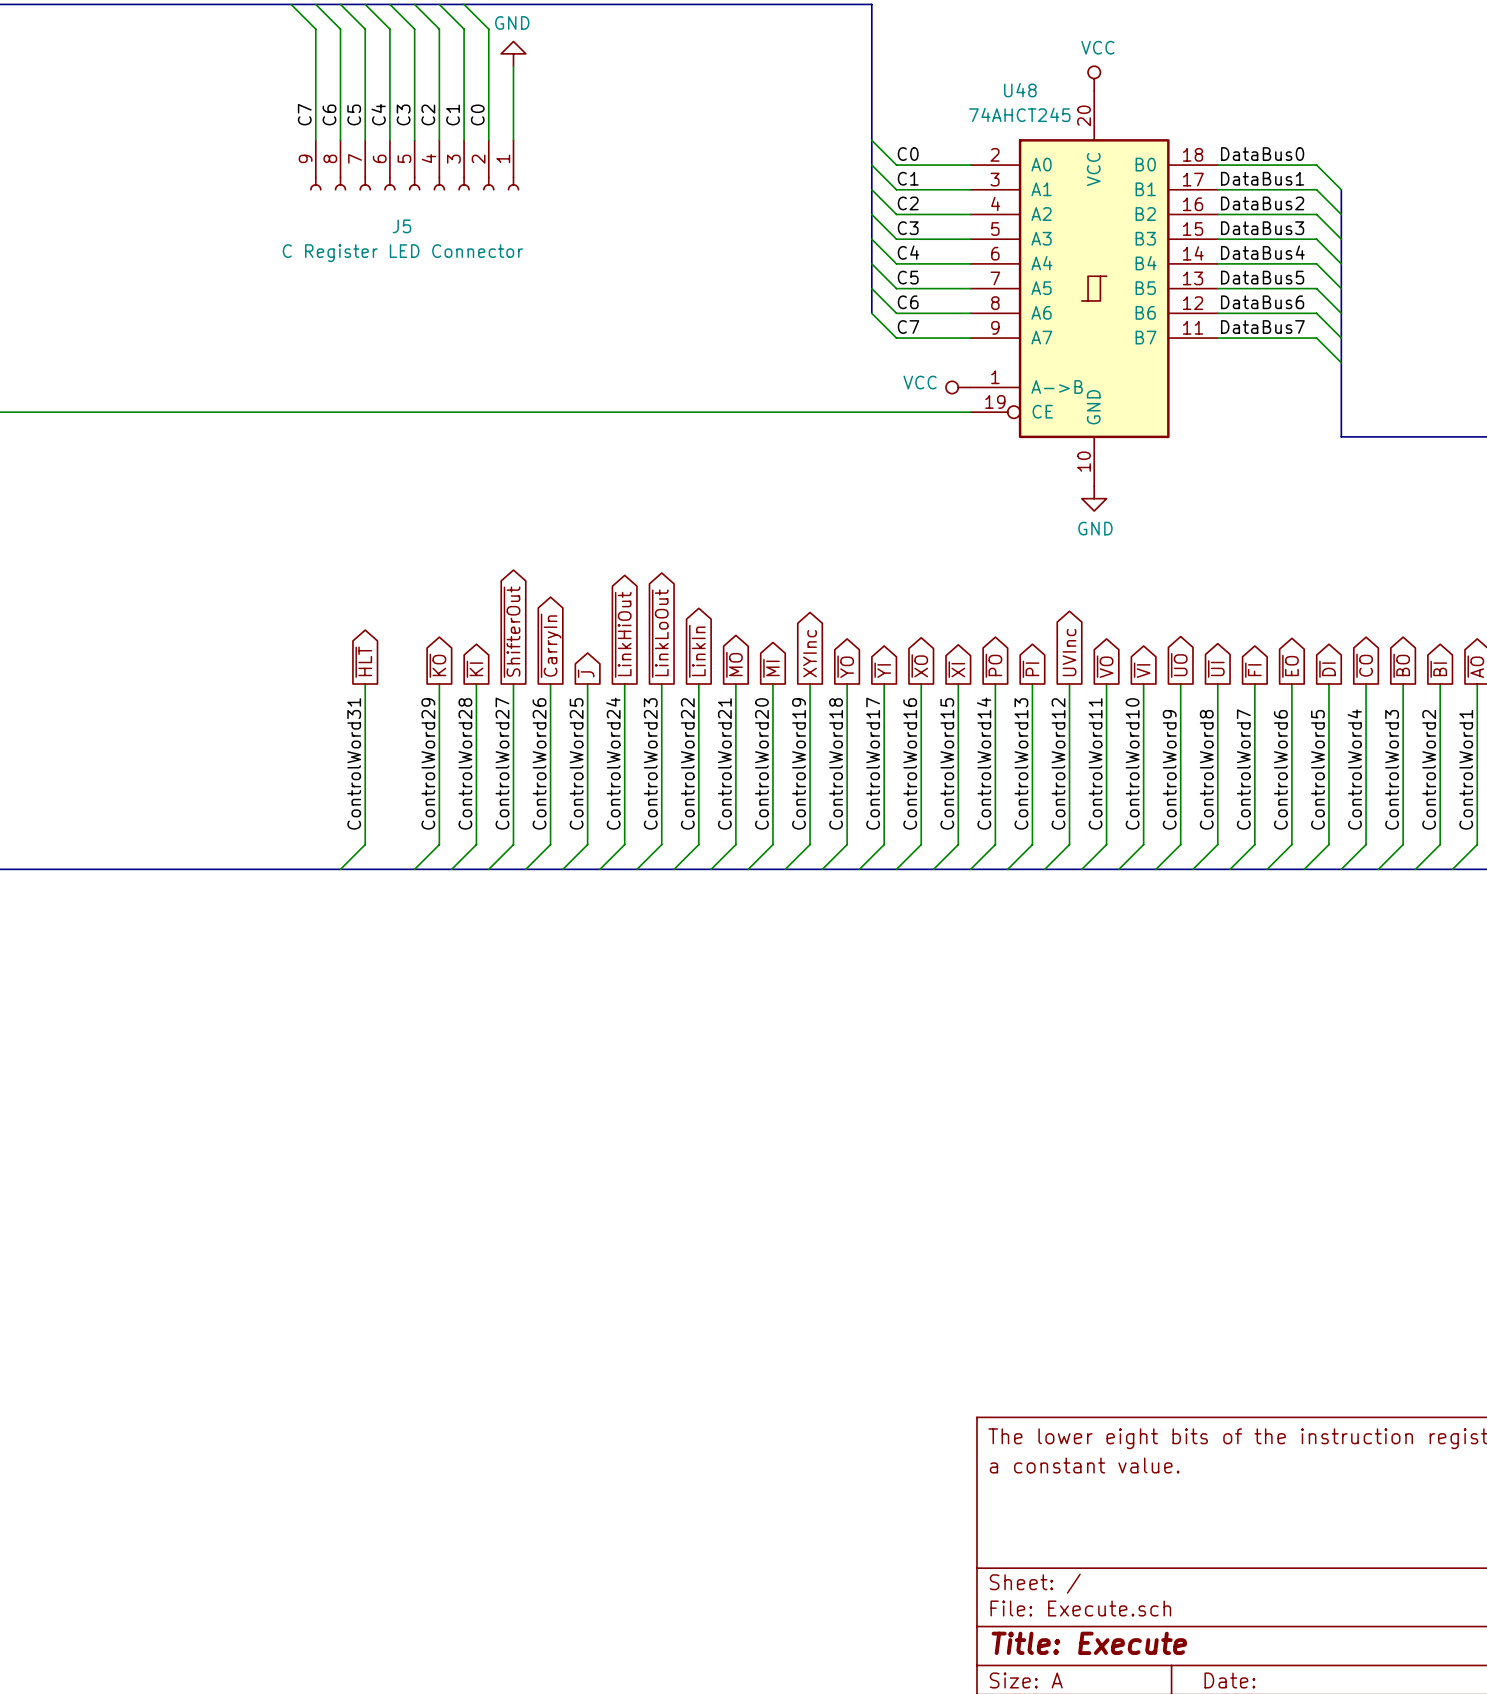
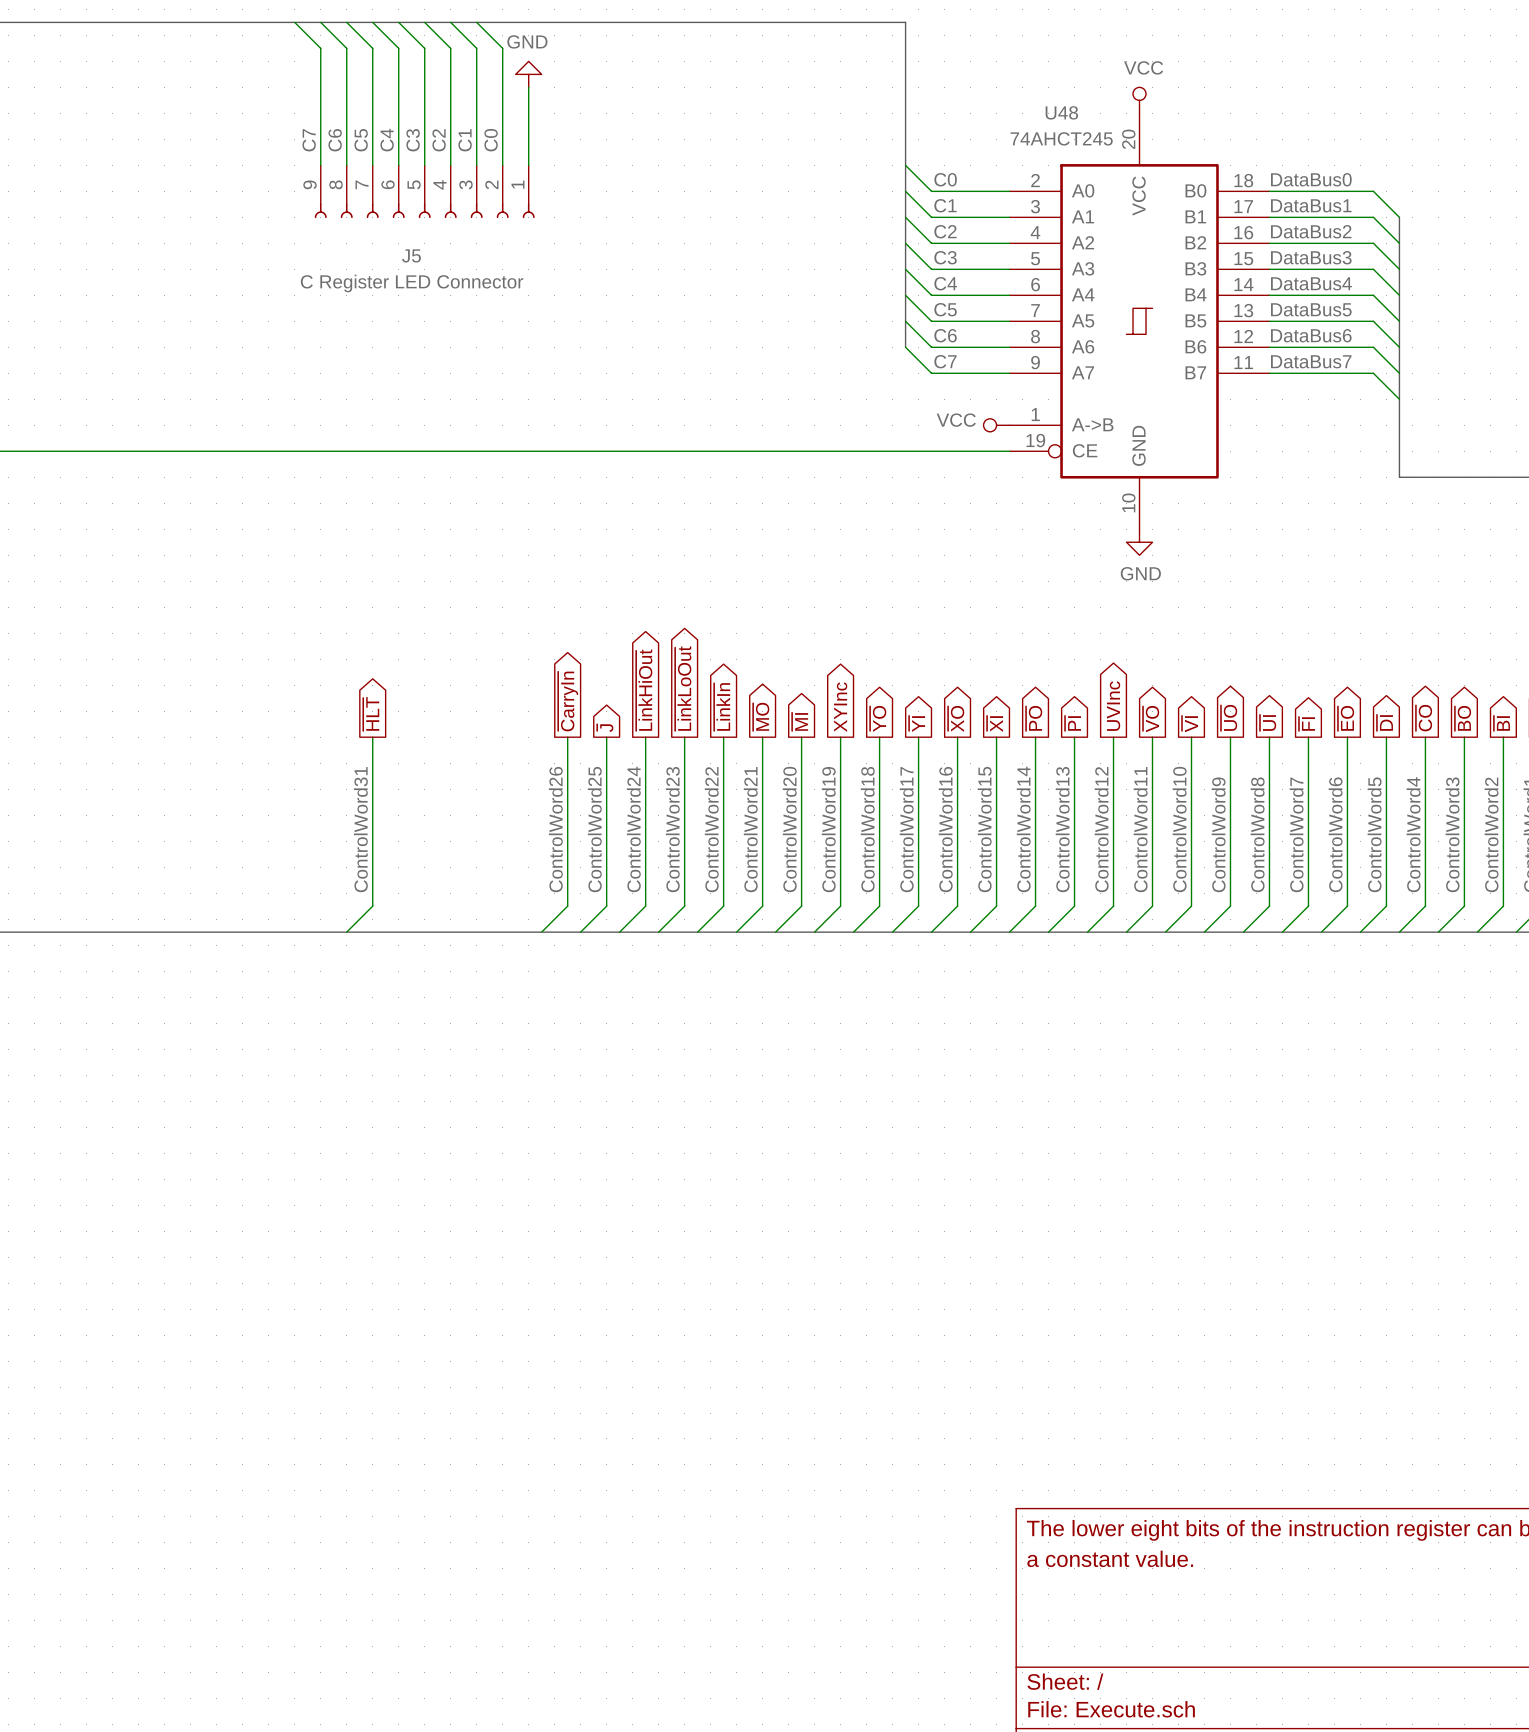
global label: ~{ShifterOut} (512, 632) -> none
global label: ~{KO} (437, 665) -> none
global label: ~{KI} (475, 669) -> none
wire: (439, 684) (439, 844) (414, 869) -> none
wire: (476, 684) (476, 844) (451, 869) -> none
wire: (513, 684) (513, 844) (488, 869) -> none
label: ControlWord29 (428, 763) -> none
label: ControlWord28 (465, 763) -> none
label: ControlWord27 (502, 763) -> none

